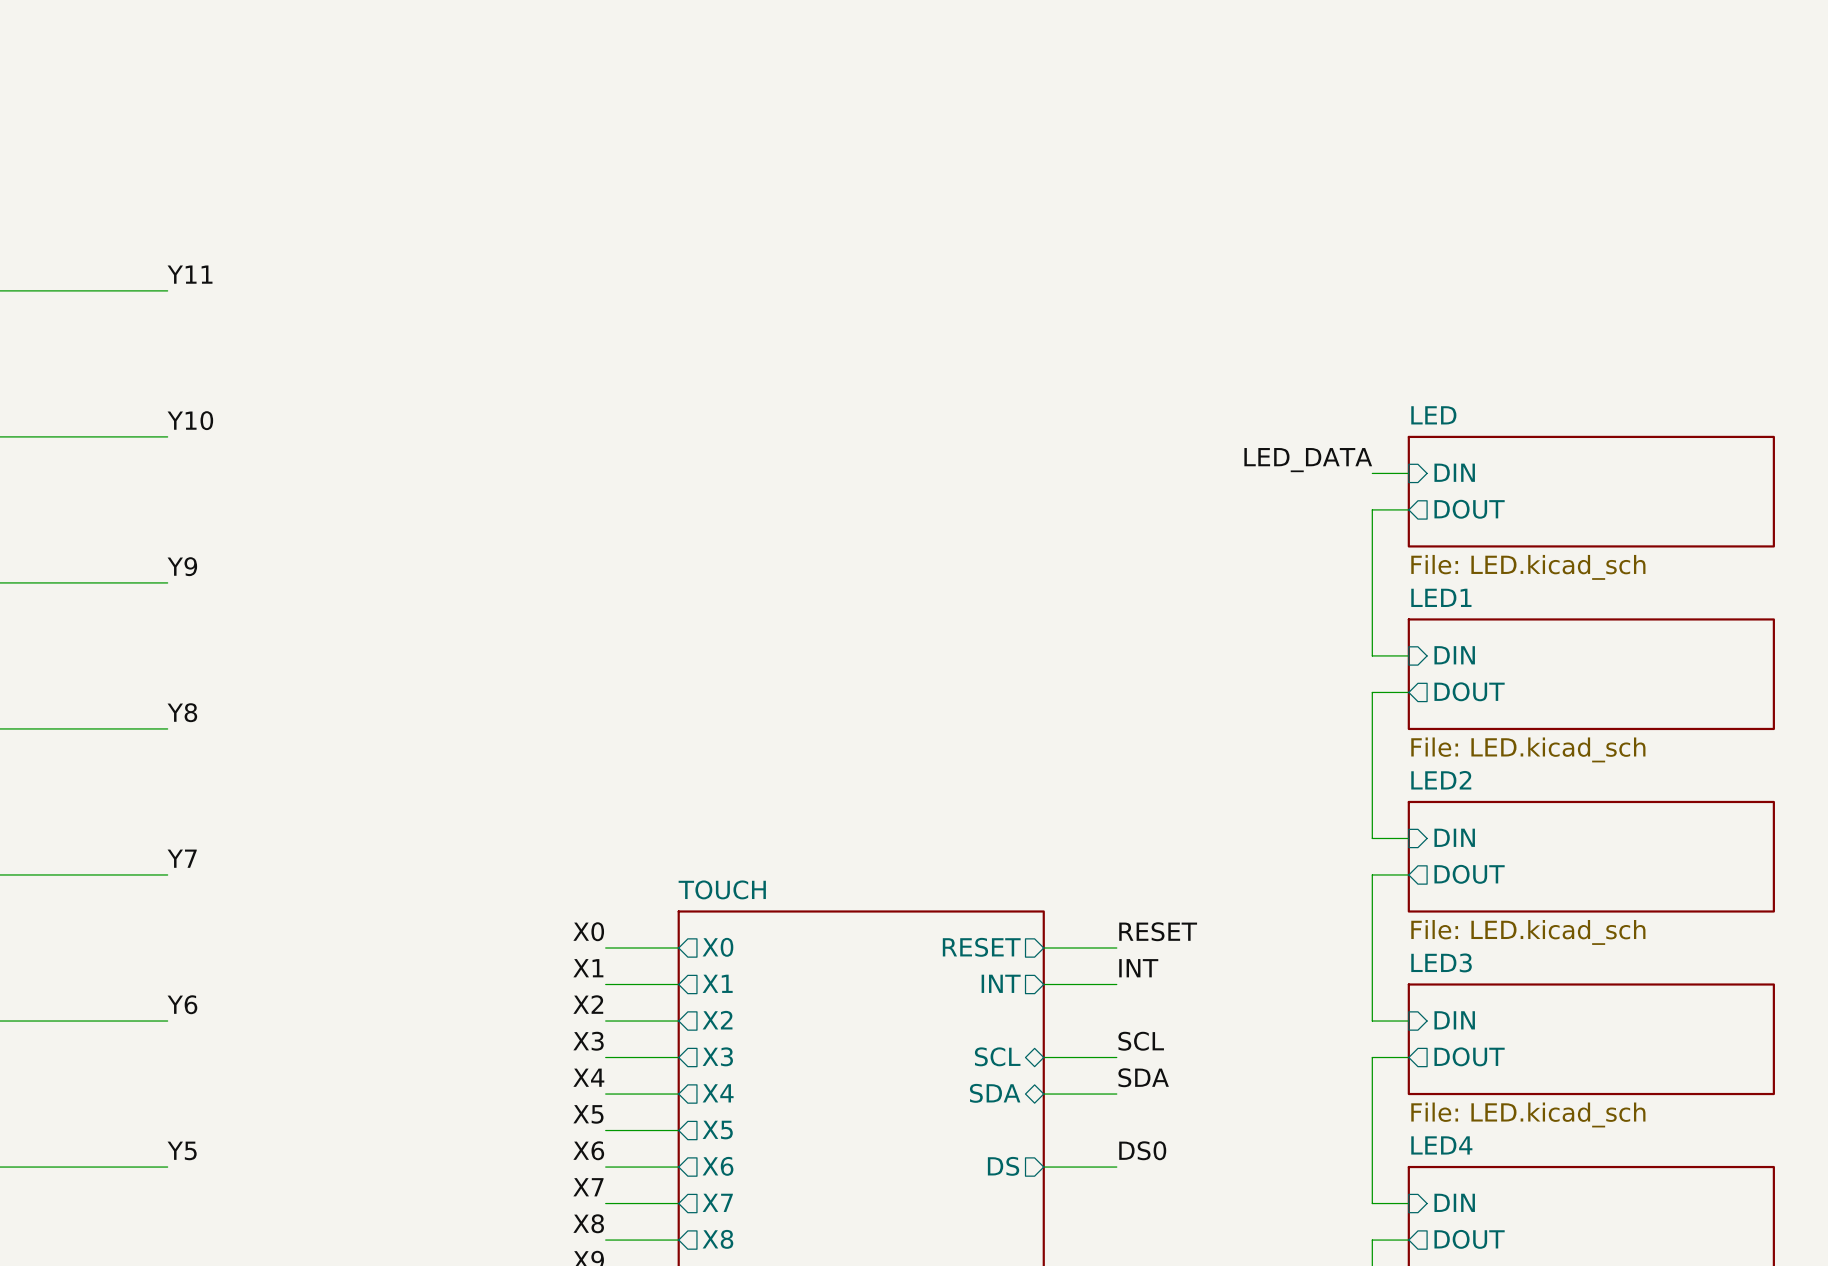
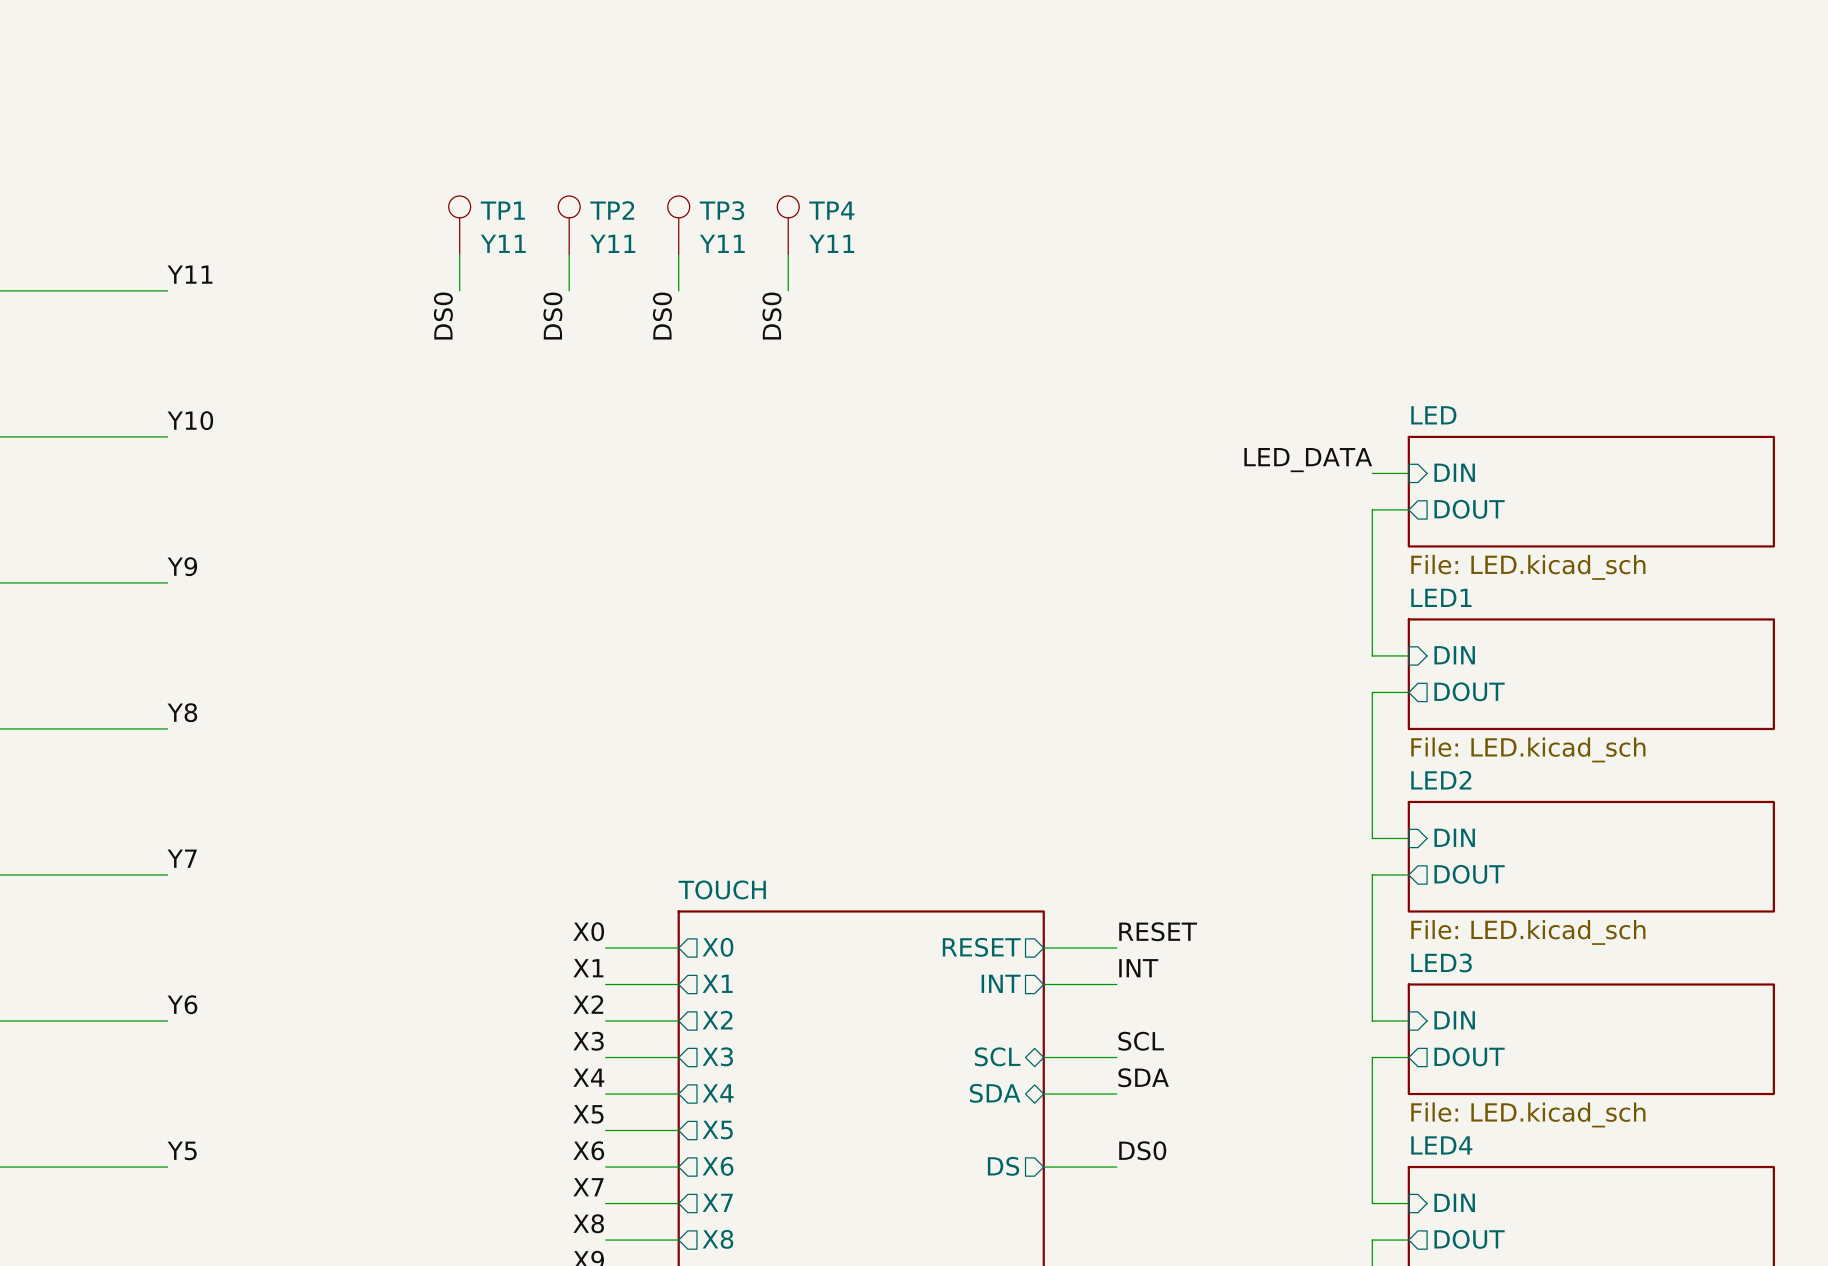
TP1: none -> Y11 (459, 225)
TP2: none -> Y11 (569, 225)
TP3: none -> Y11 (678, 225)
TP4: none -> Y11 (788, 225)
wire: none -> (459, 254) (459, 290)
wire: none -> (569, 254) (569, 290)
wire: none -> (678, 254) (678, 290)
wire: none -> (788, 254) (788, 290)
label: none -> DS0 (443, 316)
label: none -> DS0 (552, 316)
label: none -> DS0 (662, 316)
label: none -> DS0 (771, 316)

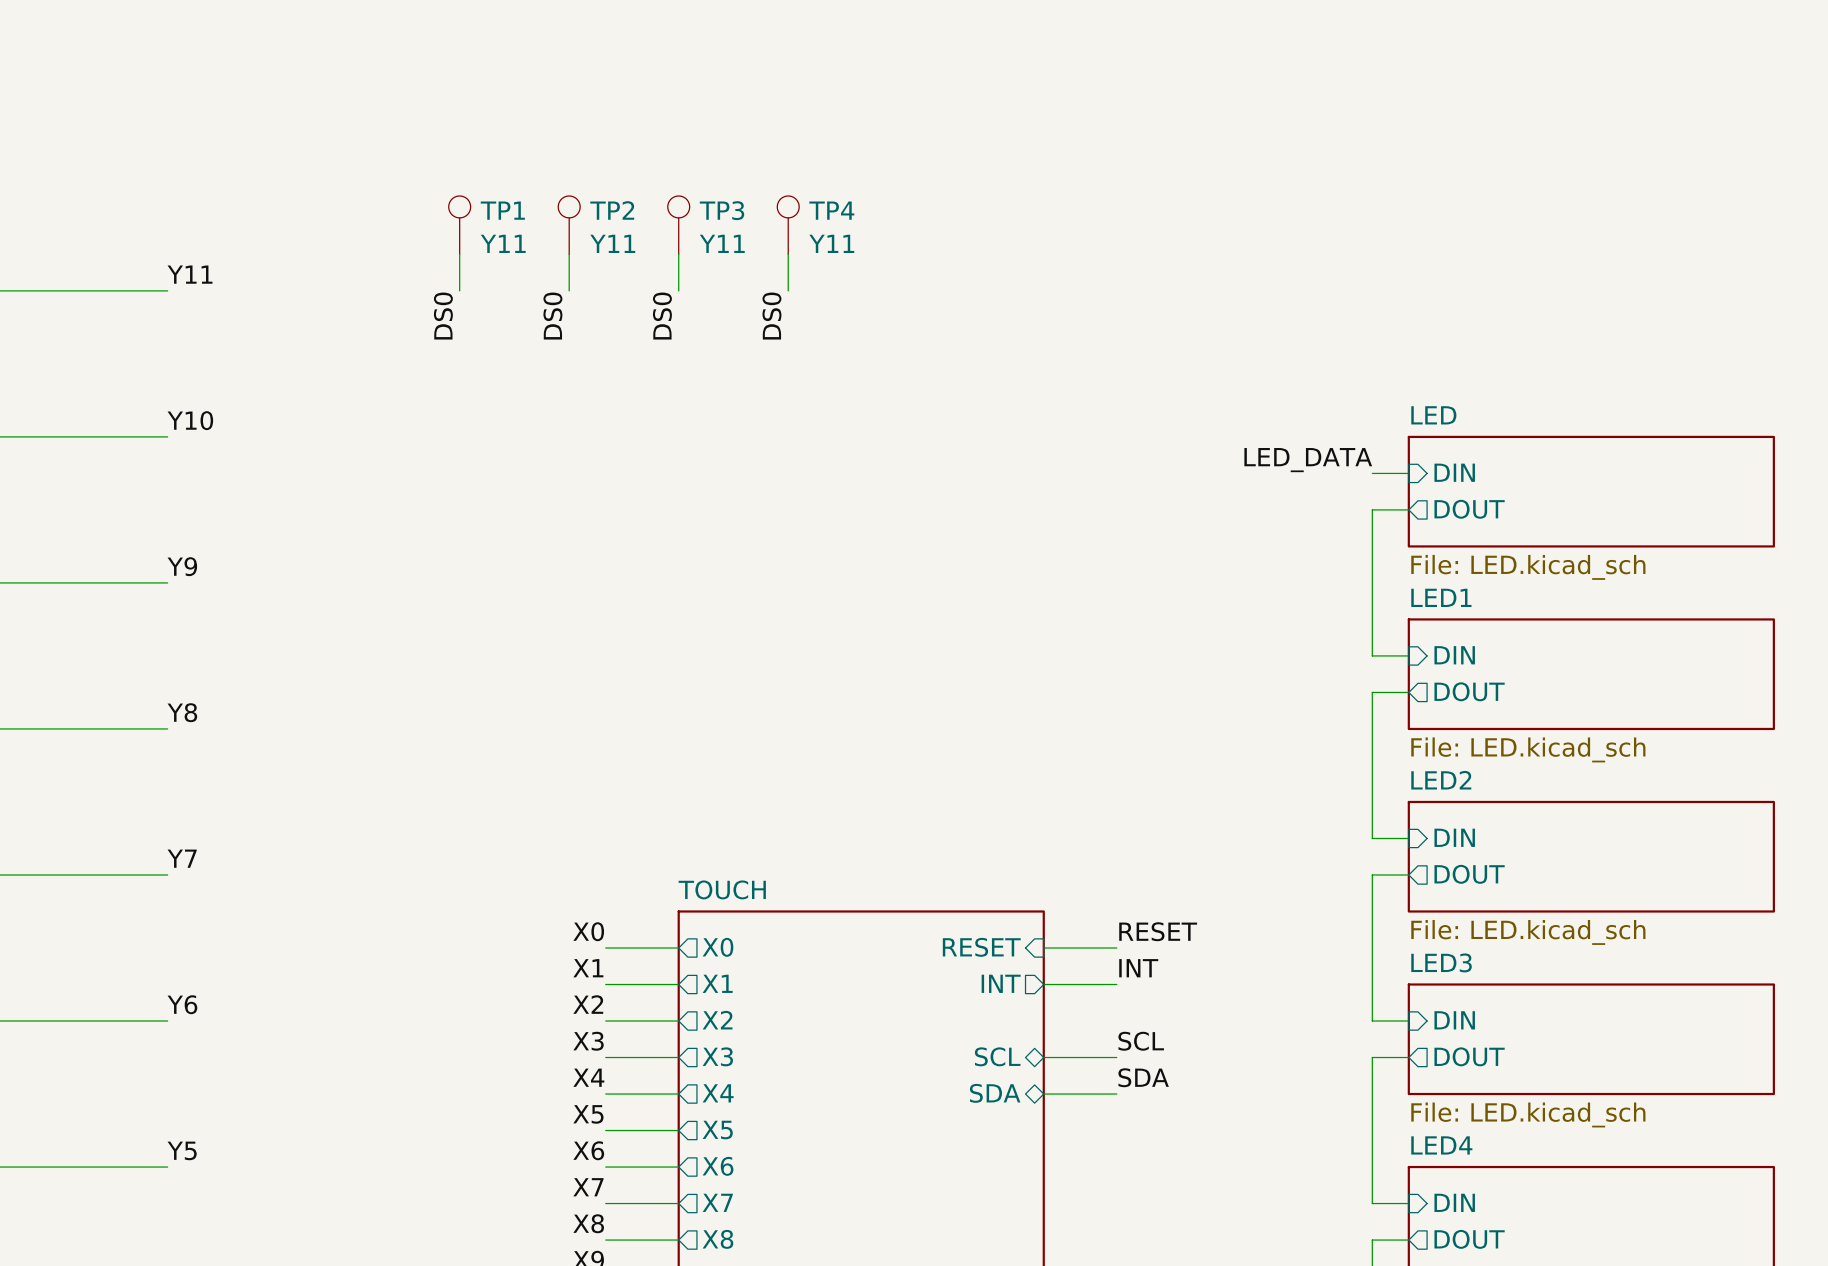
sheet pin shape: output (981, 947) -> input (981, 947)
label: DS0 (1142, 1150) -> none
sheet pin: DS (1003, 1166) -> none
wire: (1043, 1167) (1116, 1167) -> none

